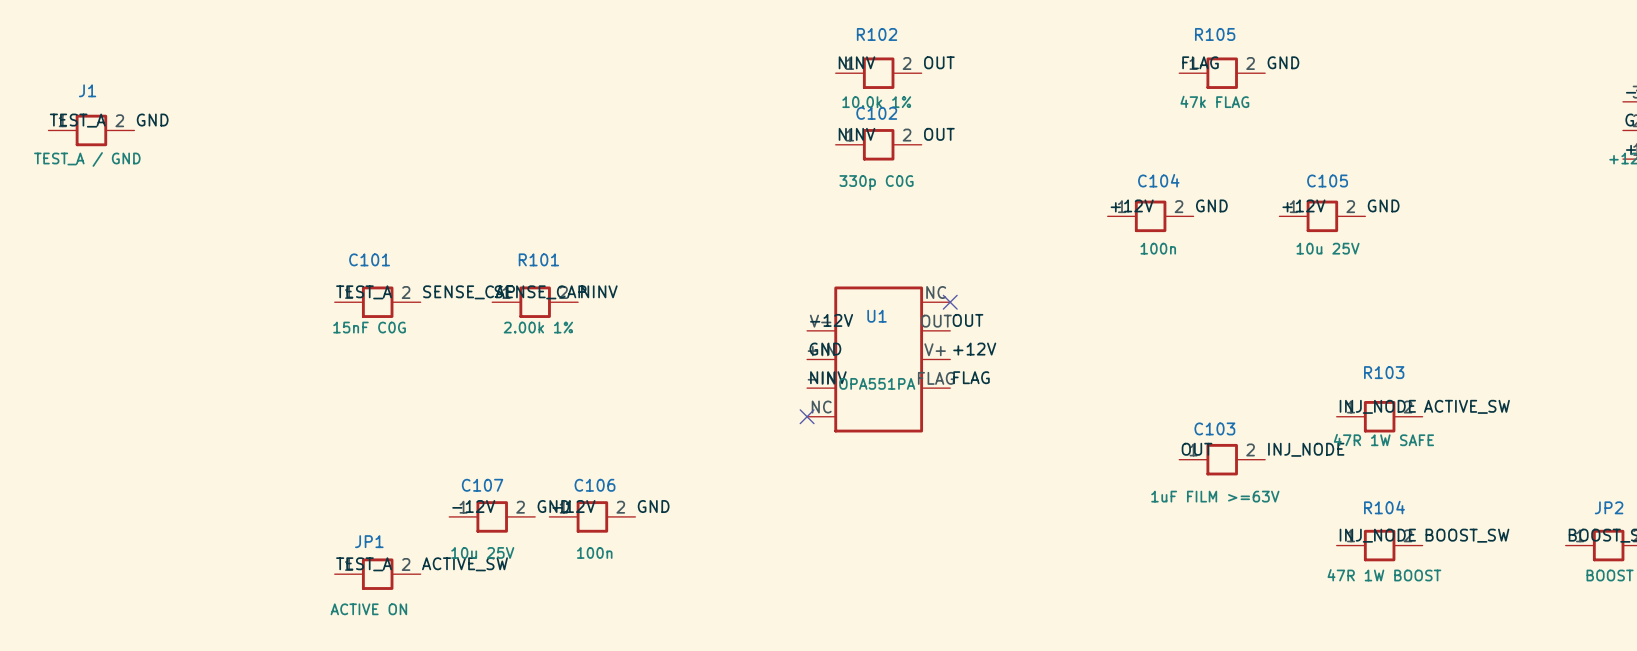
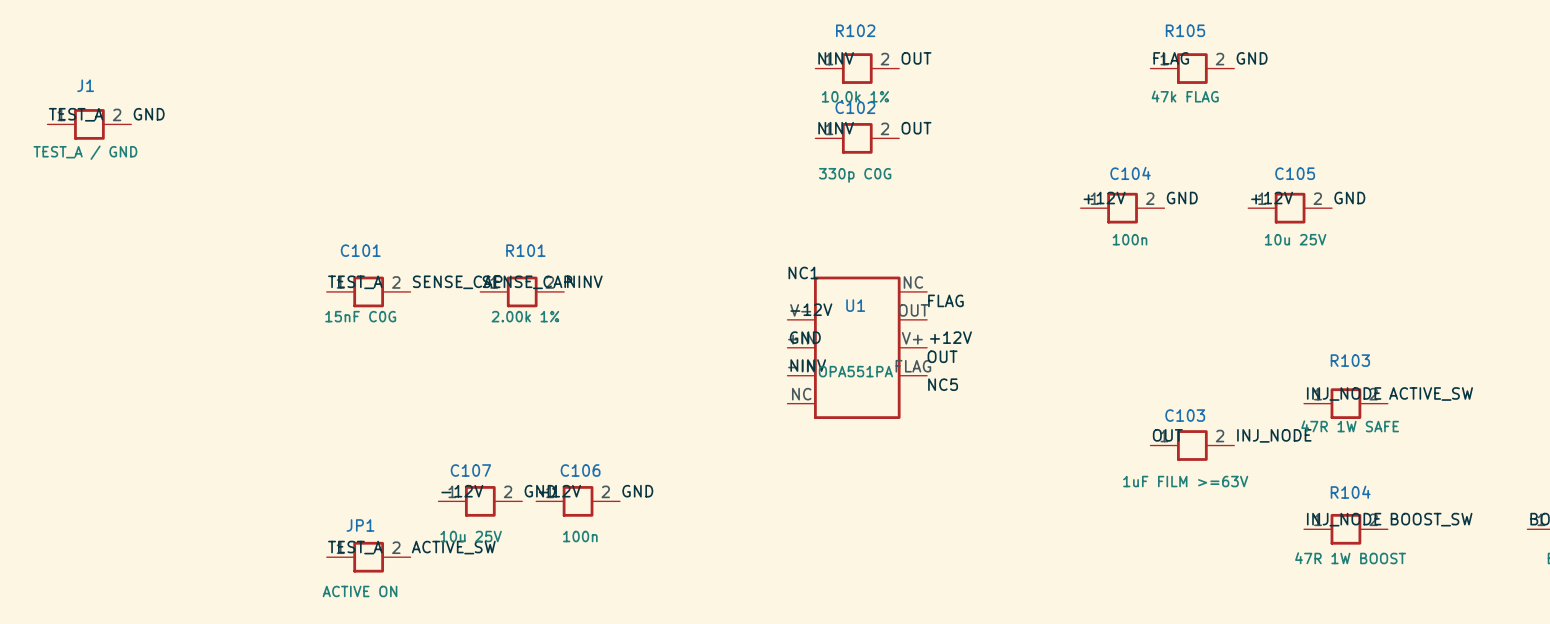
label: none -> NC1 (803, 272)
no-connect mark: (950, 302) -> none
label position: OUT (968, 320) -> OUT (942, 356)
label position: FLAG (971, 377) -> FLAG (945, 300)
label: none -> NC5 (943, 384)
no-connect mark: (807, 416) -> none

